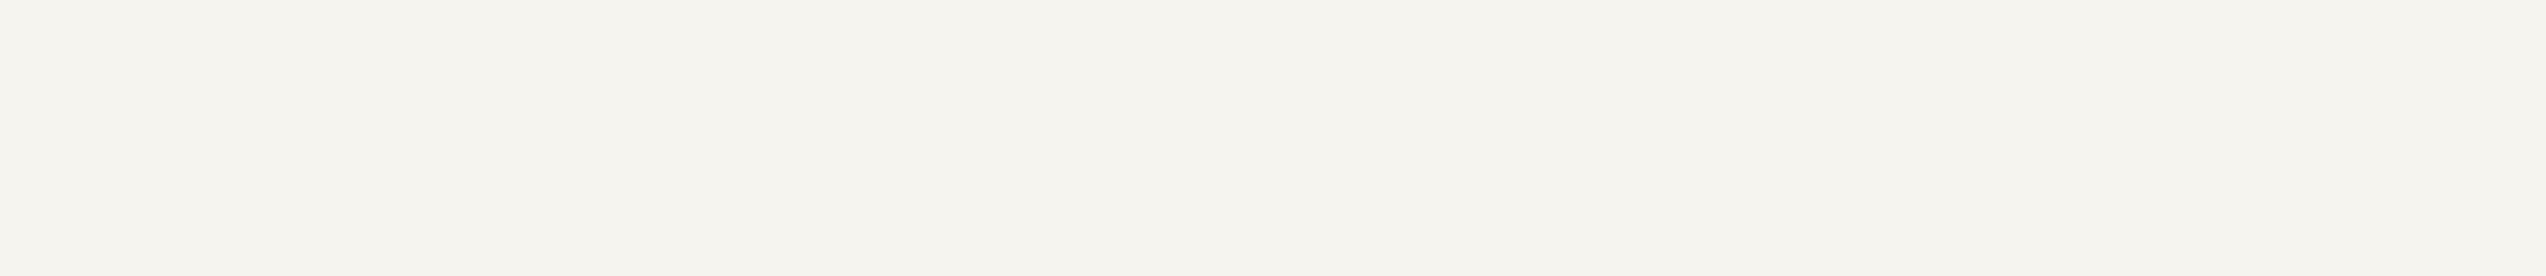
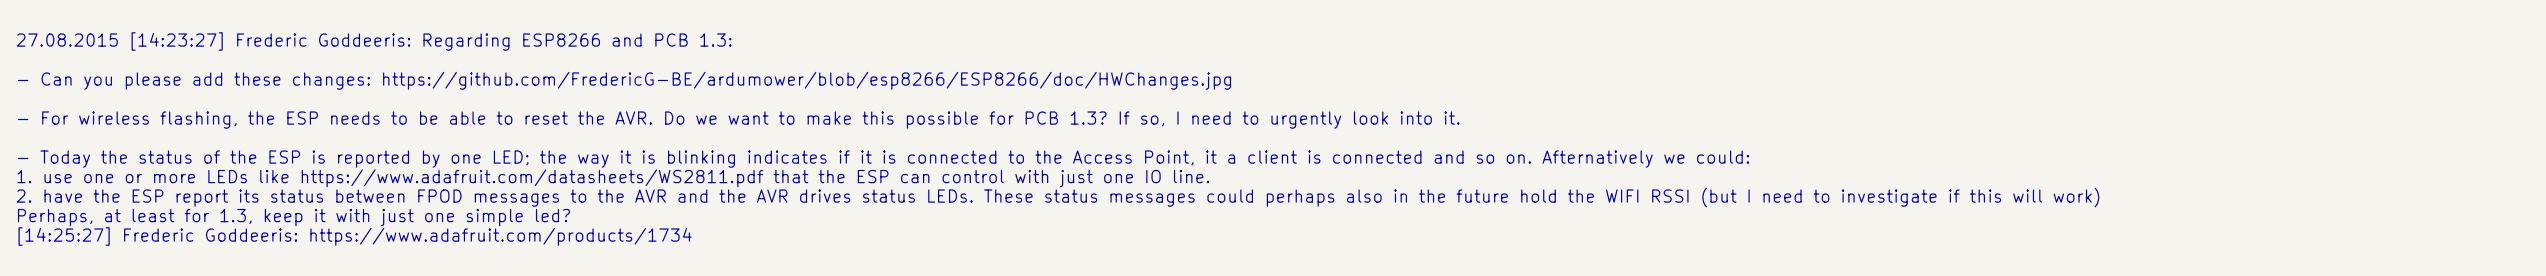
text: none -> 27.08.2015 [14:23:27] Frederic Goddeeris: Regarding ESP8266 and PCB 1.3: (374, 41)
text: none -> - Can you please add these changes: https://github.com/FredericG-BE/ardumower/blob/esp8266/ESP8266/doc/HWChanges.jpg (624, 80)
text: none -> - For wireless flashing, the ESP needs to be able to reset the AVR. Do we want to make this possible for PCB 1.3? If so, I need to urgently look into it. (738, 120)
text: none -> - Today the status of the ESP is reported by one LED; the way it is blinking indicates if it is connected to the Access Point, it a client is connected and so on. Afternatively we could: (883, 159)
text: none -> 1. use one or more LEDs like https://www.adafruit.com/datasheets/WS2811.pdf that the ESP can control with just one IO line. (613, 178)
text: none -> 2. have the ESP report its status between FPOD messages to the AVR and the AVR drives status LEDs. These status messages could perhaps also in the future hold the WIFI RSSI (but I need to investigate if this will work) (1058, 197)
text: none -> Perhaps, at least for 1.3, keep it with just one simple led? (293, 217)
text: none -> [14:25:27] Frederic Goddeeris: https://www.adafruit.com/products/1734 (355, 236)

